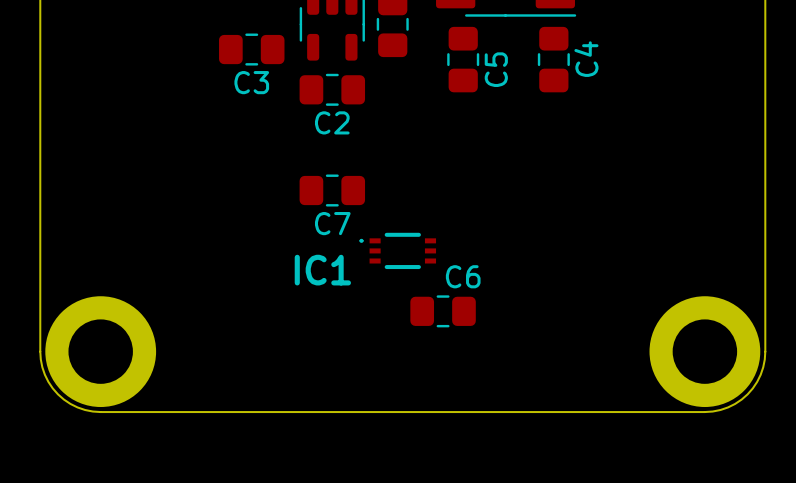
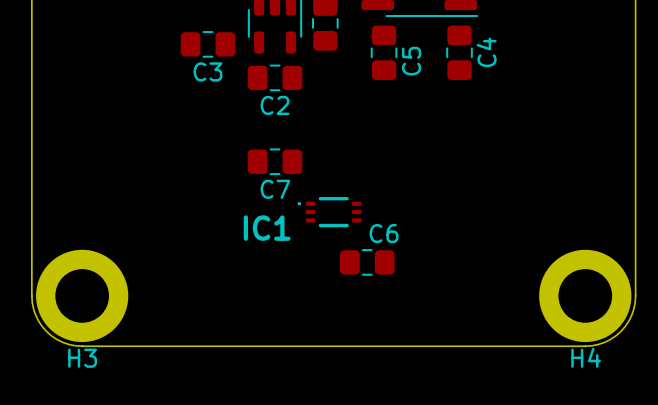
H4 name: none -> H4 (586, 357)
H3 name: none -> H3 (82, 358)

